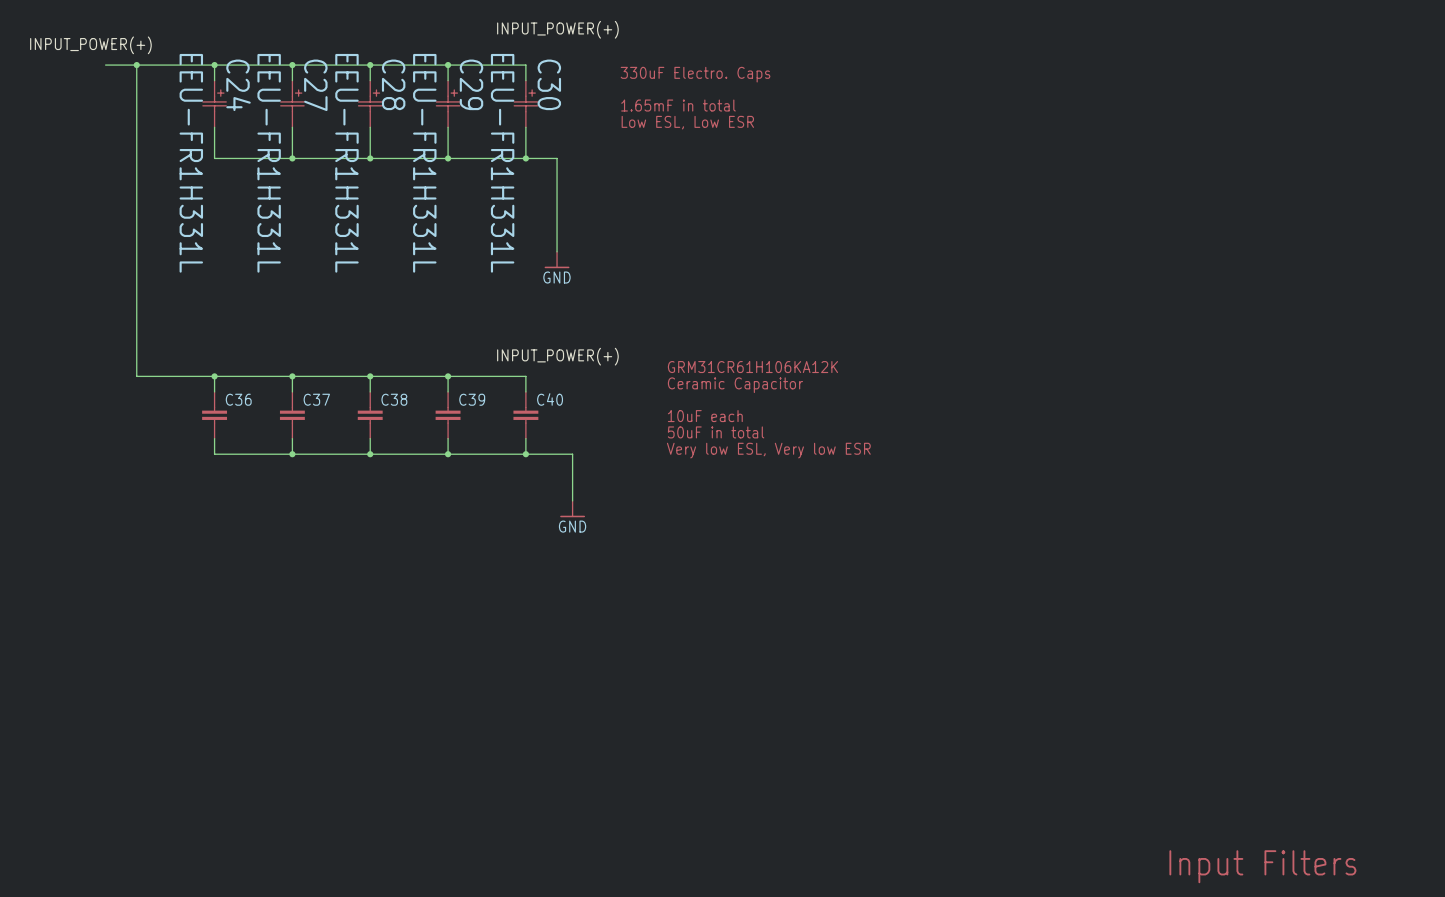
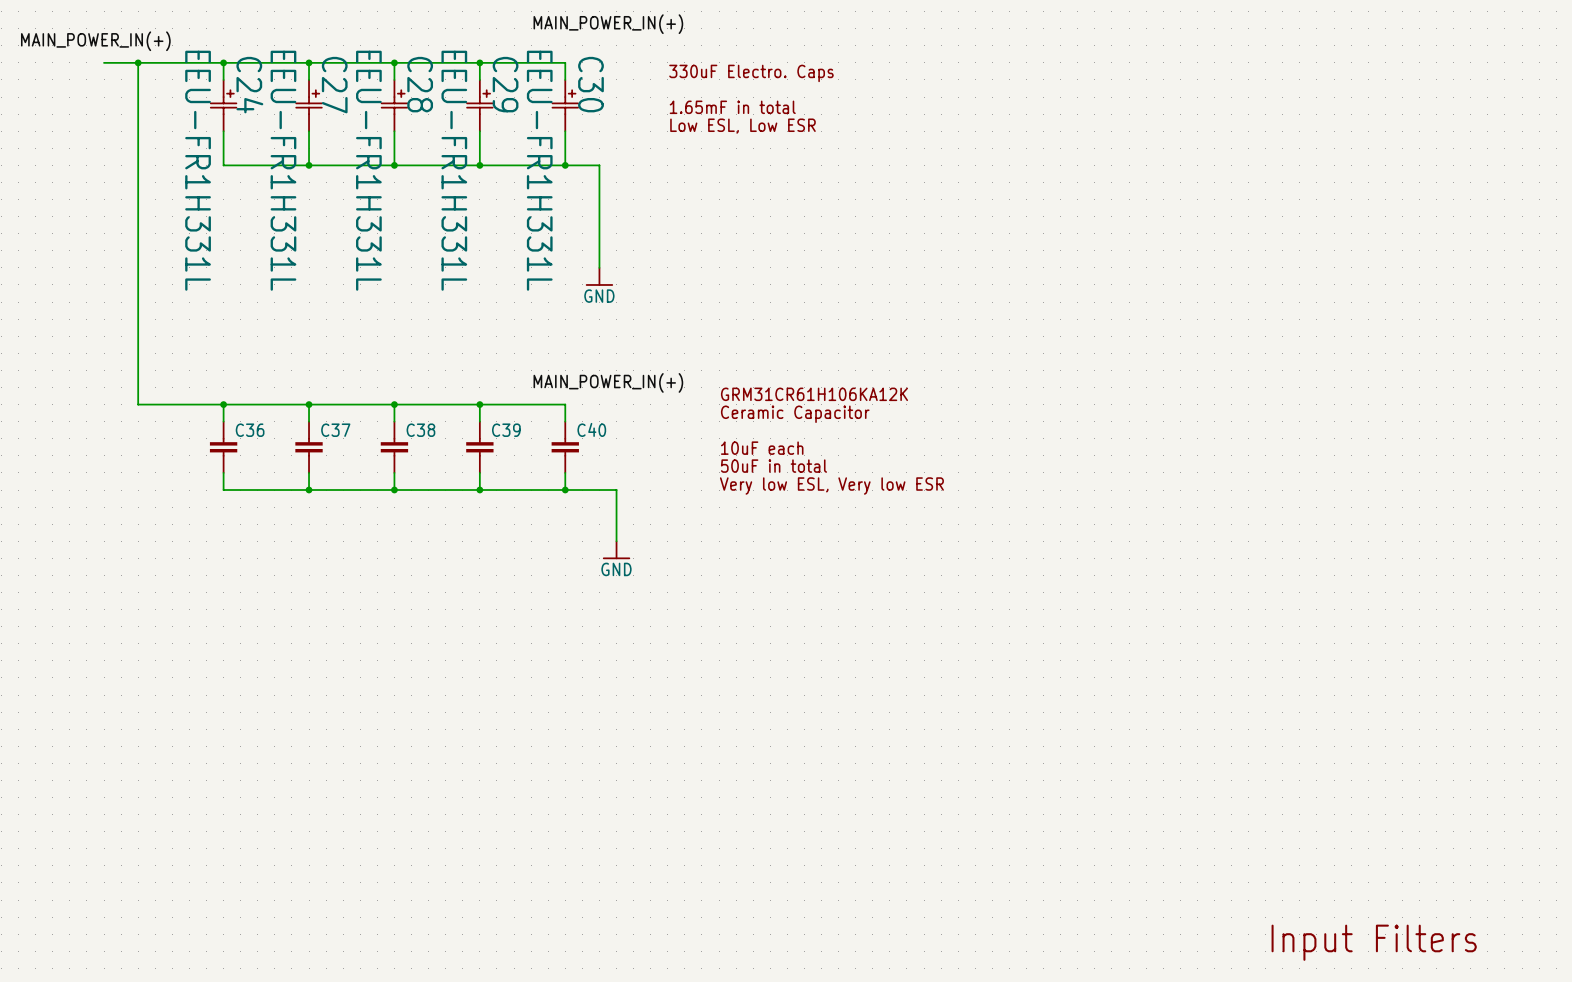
label: INPUT_POWER(+) (557, 29) -> MAIN_POWER_IN(+) (608, 24)
label: INPUT_POWER(+) (90, 45) -> MAIN_POWER_IN(+) (95, 41)
label: INPUT_POWER(+) (557, 356) -> MAIN_POWER_IN(+) (608, 382)

